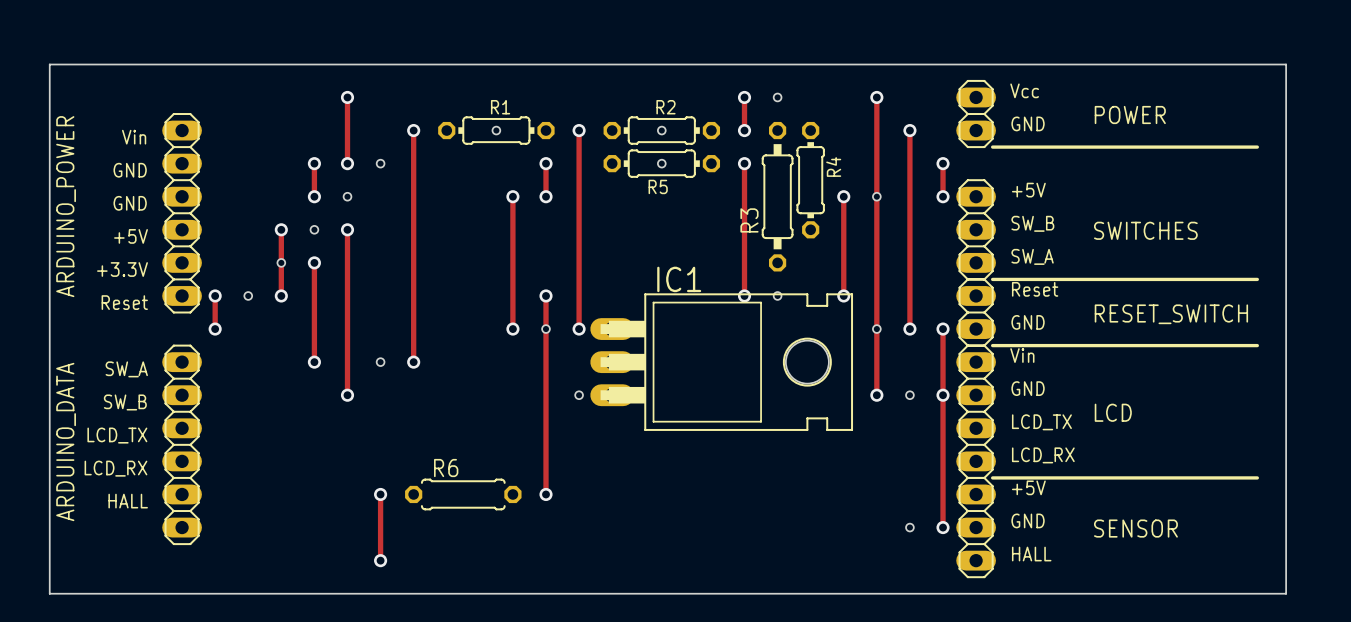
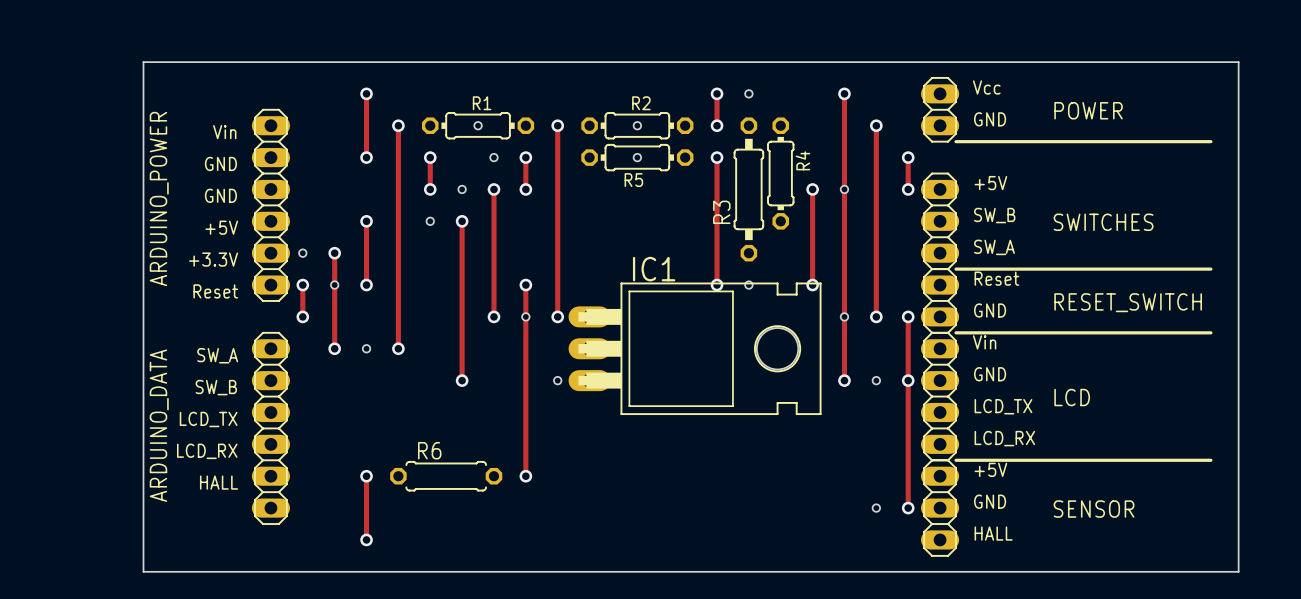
board edge: (148, 64) (49, 64) (49, 593) (148, 593) -> (143, 62) (143, 571)
track: (347, 97) (347, 163) -> (366, 93) (366, 157)
via position: (347, 97) -> (366, 93)
text position: Vin (134, 137) -> Vin (224, 132)
track: (314, 163) (314, 196) -> none
via: (314, 163) -> none
via: (347, 163) -> none
hole: (380, 163) -> none
via: none -> (366, 157)
via: none -> (430, 157)
hole: none -> (493, 157)
text: GND (130, 170) -> none
text: none -> GND (220, 163)
via: (314, 196) -> none
hole: (347, 196) -> none
via: none -> (430, 189)
hole: none -> (462, 189)
text: GND (130, 203) -> none
text: none -> GND (220, 195)
ARDUINO_POWER position: (182, 213) -> (270, 205)
track: (281, 229) (281, 295) -> (366, 221) (366, 285)
via: (281, 229) -> none
hole: (314, 229) -> none
track: (347, 229) (347, 262) -> (430, 157) (430, 189)
via: (347, 229) -> none
via: none -> (366, 221)
hole: none -> (430, 221)
track: none -> (462, 221) (462, 380)
via: none -> (462, 221)
text position: +5V (131, 236) -> +5V (221, 227)
hole: (281, 262) -> none
track: (314, 262) (314, 295) -> none
hole: none -> (302, 253)
via: (314, 262) -> none
via: none -> (334, 253)
text position: +3.3V (122, 269) -> +3.3V (213, 259)
track: (215, 295) (215, 329) -> none
via: (215, 295) -> none
hole: (248, 295) -> none
via: (281, 295) -> none
via: none -> (302, 285)
hole: none -> (334, 285)
via: none -> (366, 285)
text position: Reset (124, 302) -> Reset (215, 291)
via: (215, 329) -> none
track: (314, 329) (314, 362) -> none
via: none -> (302, 316)
via: (314, 362) -> none
track: (347, 362) (347, 395) -> none
via: none -> (334, 348)
text position: SW_A (126, 369) -> SW_A (217, 355)
via: (347, 395) -> none
via: none -> (462, 380)
text position: SW_B (125, 402) -> SW_B (216, 387)
text position: LCD_TX (117, 435) -> LCD_TX (208, 419)
ARDUINO_DATA position: (182, 444) -> (270, 428)
text position: LCD_RX (115, 468) -> LCD_RX (207, 451)
text position: HALL (128, 501) -> HALL (219, 482)

